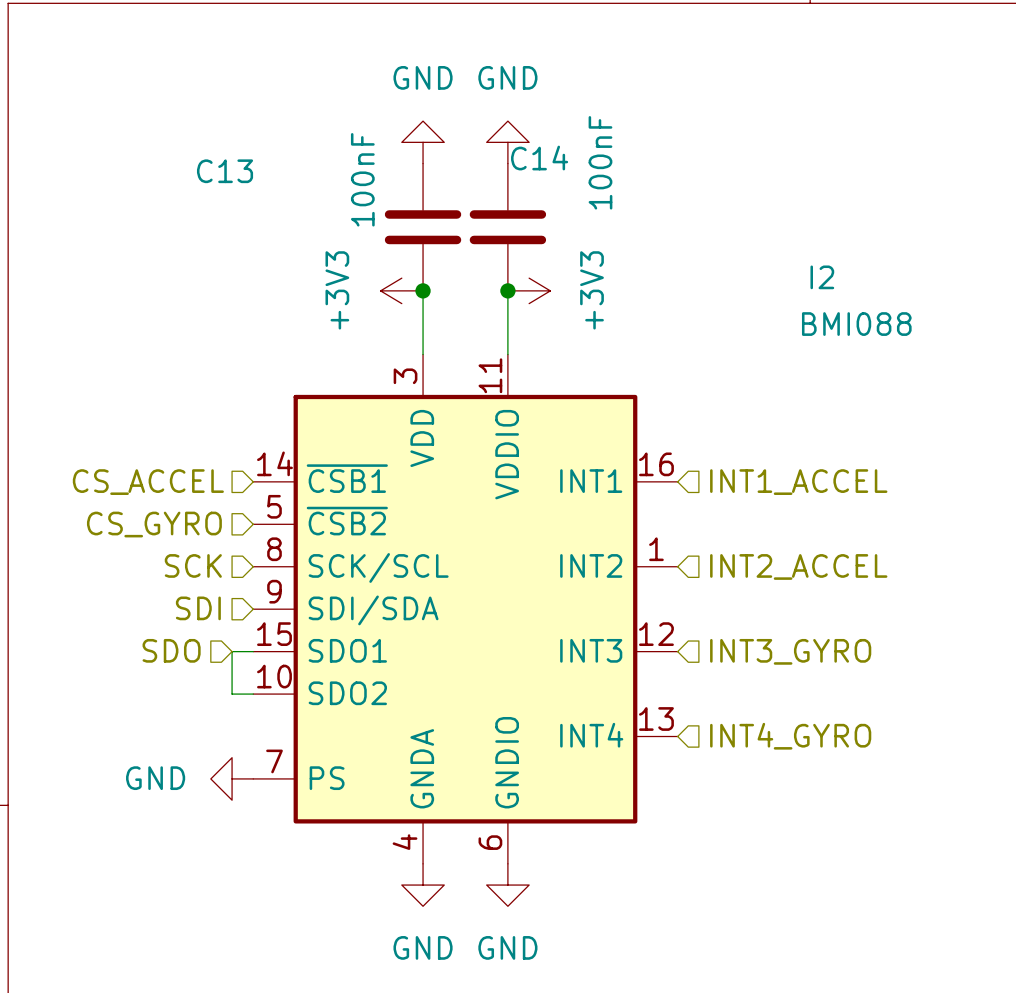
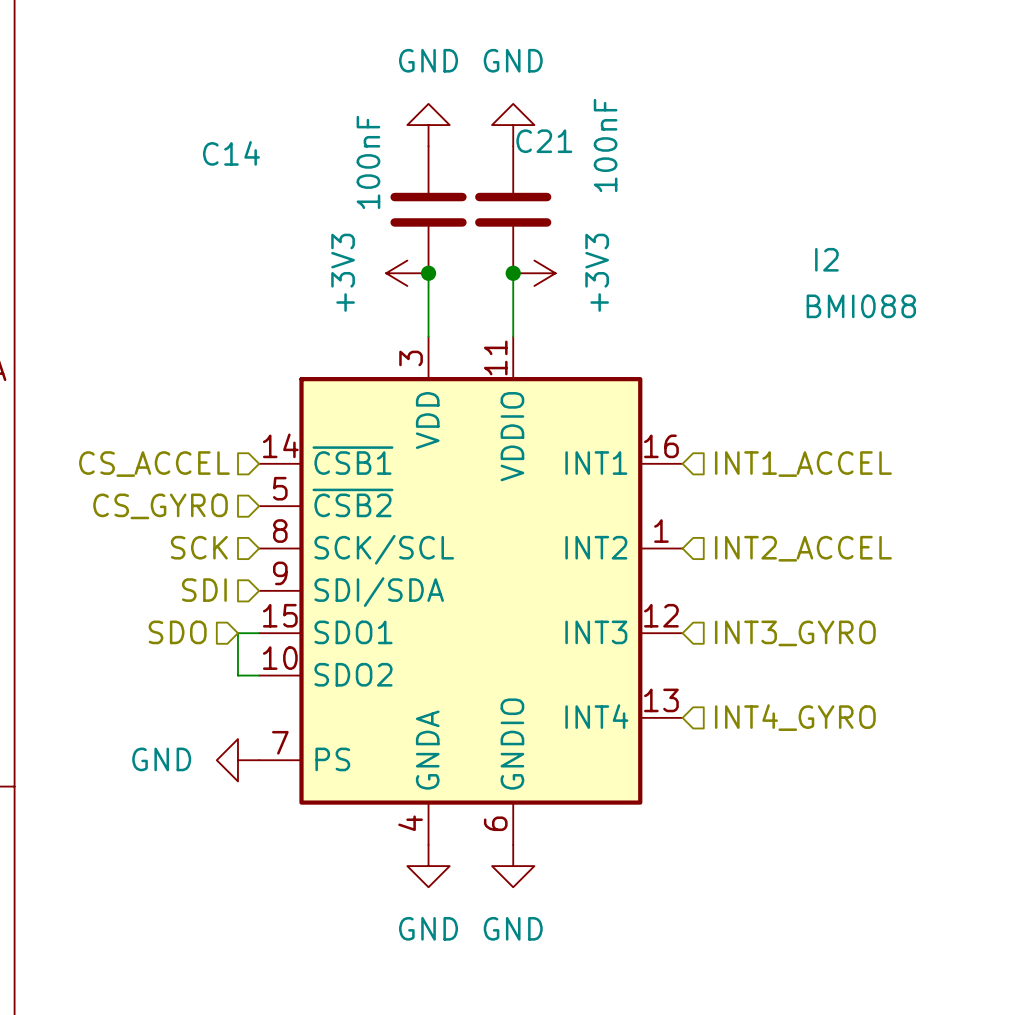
C14 name: C14 (539, 158) -> C21 (544, 141)
C13 name: C13 (225, 171) -> C14 (231, 153)

